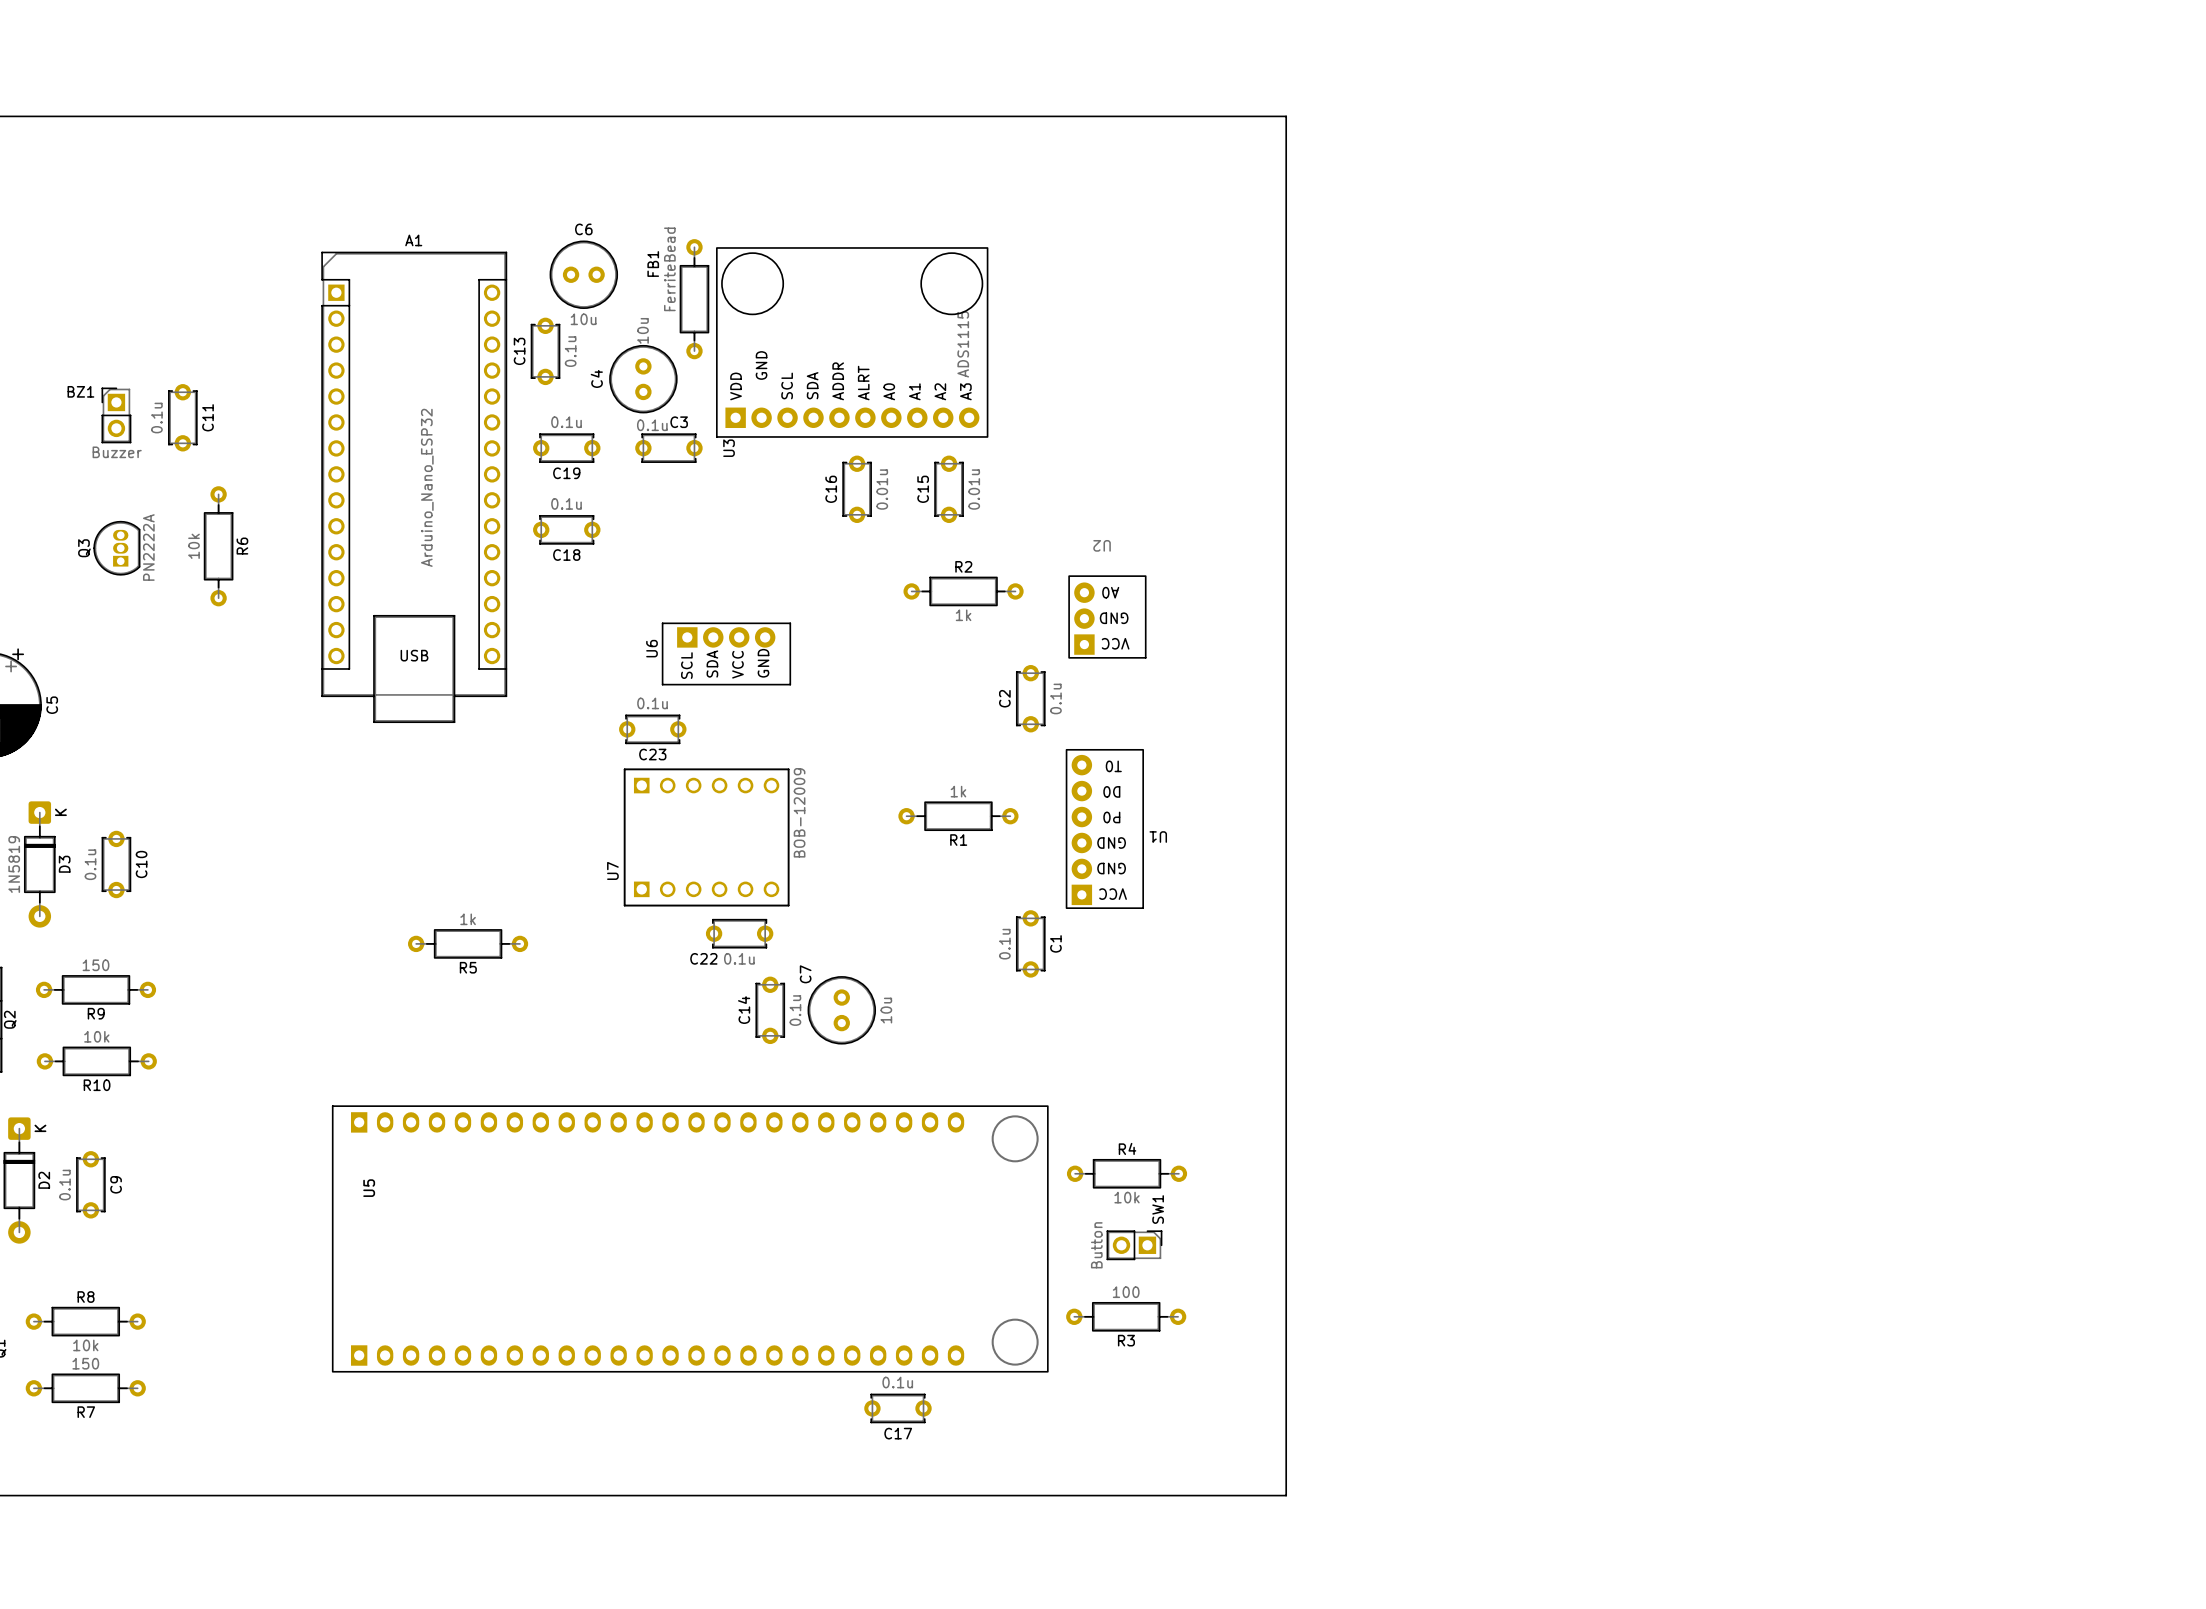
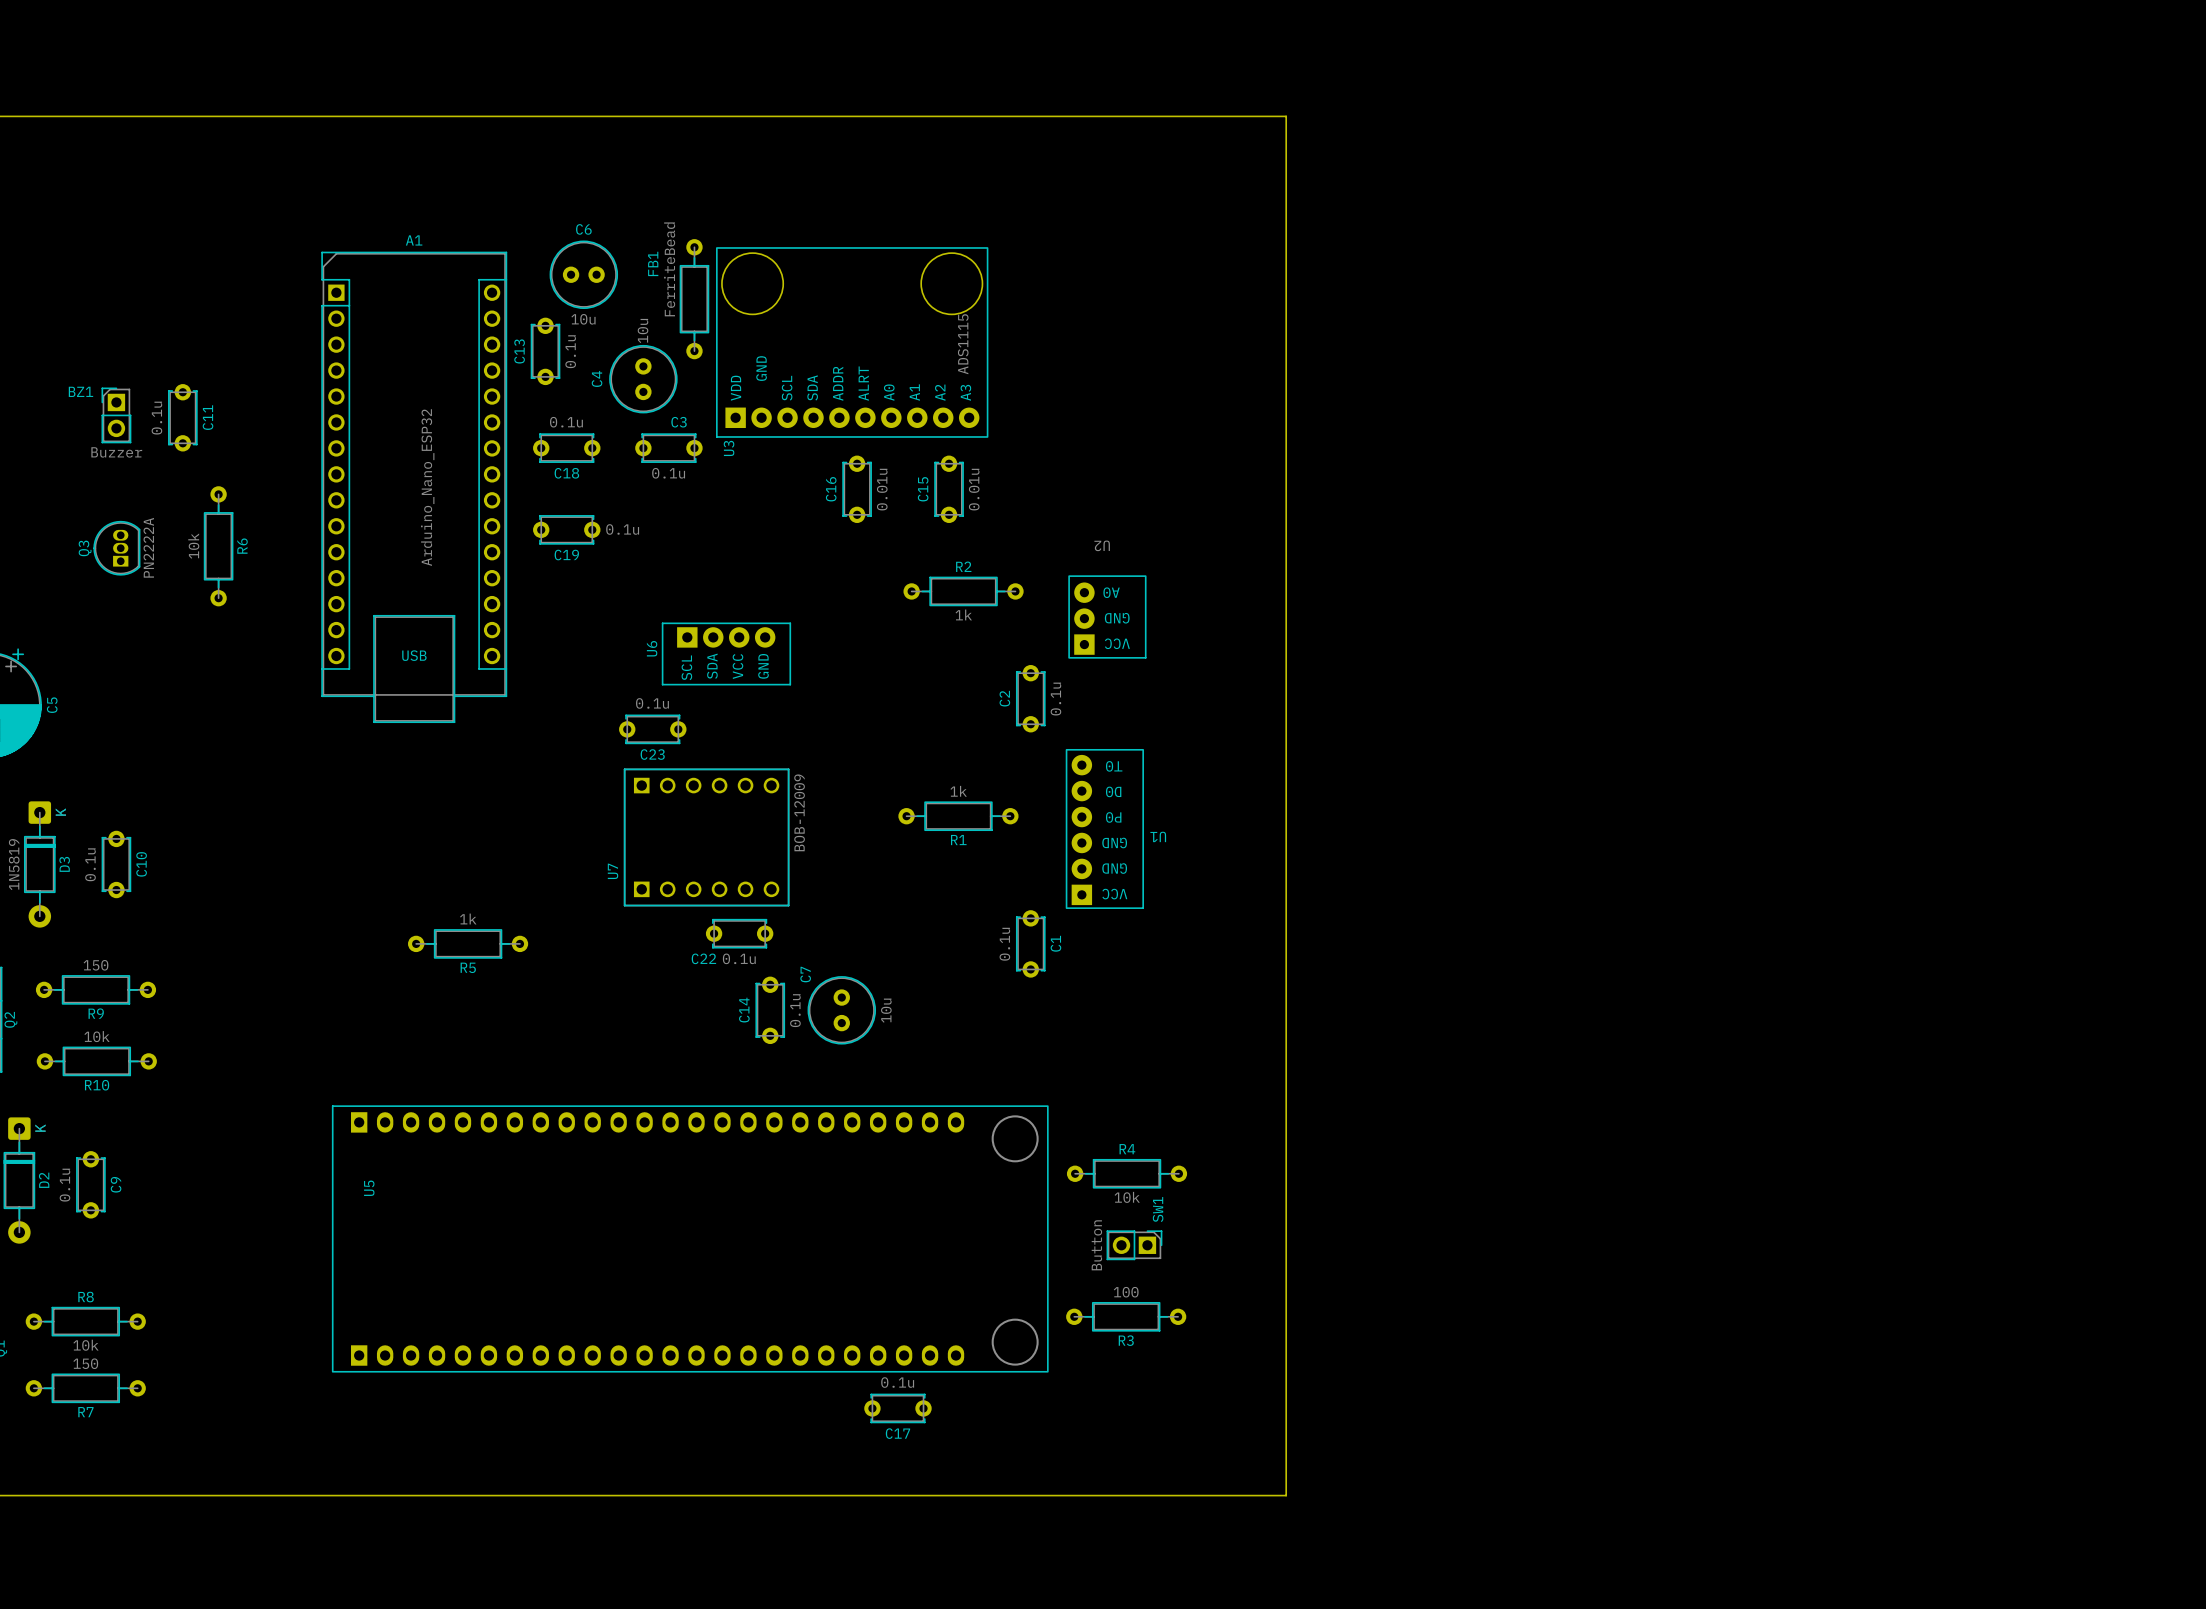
C3 value position: 0.1u (652, 425) -> 0.1u (668, 473)
C19 name: C19 (566, 473) -> C18 (566, 473)
C18 value position: 0.1u (566, 503) -> 0.1u (622, 529)
C18 name: C18 (566, 555) -> C19 (566, 555)

